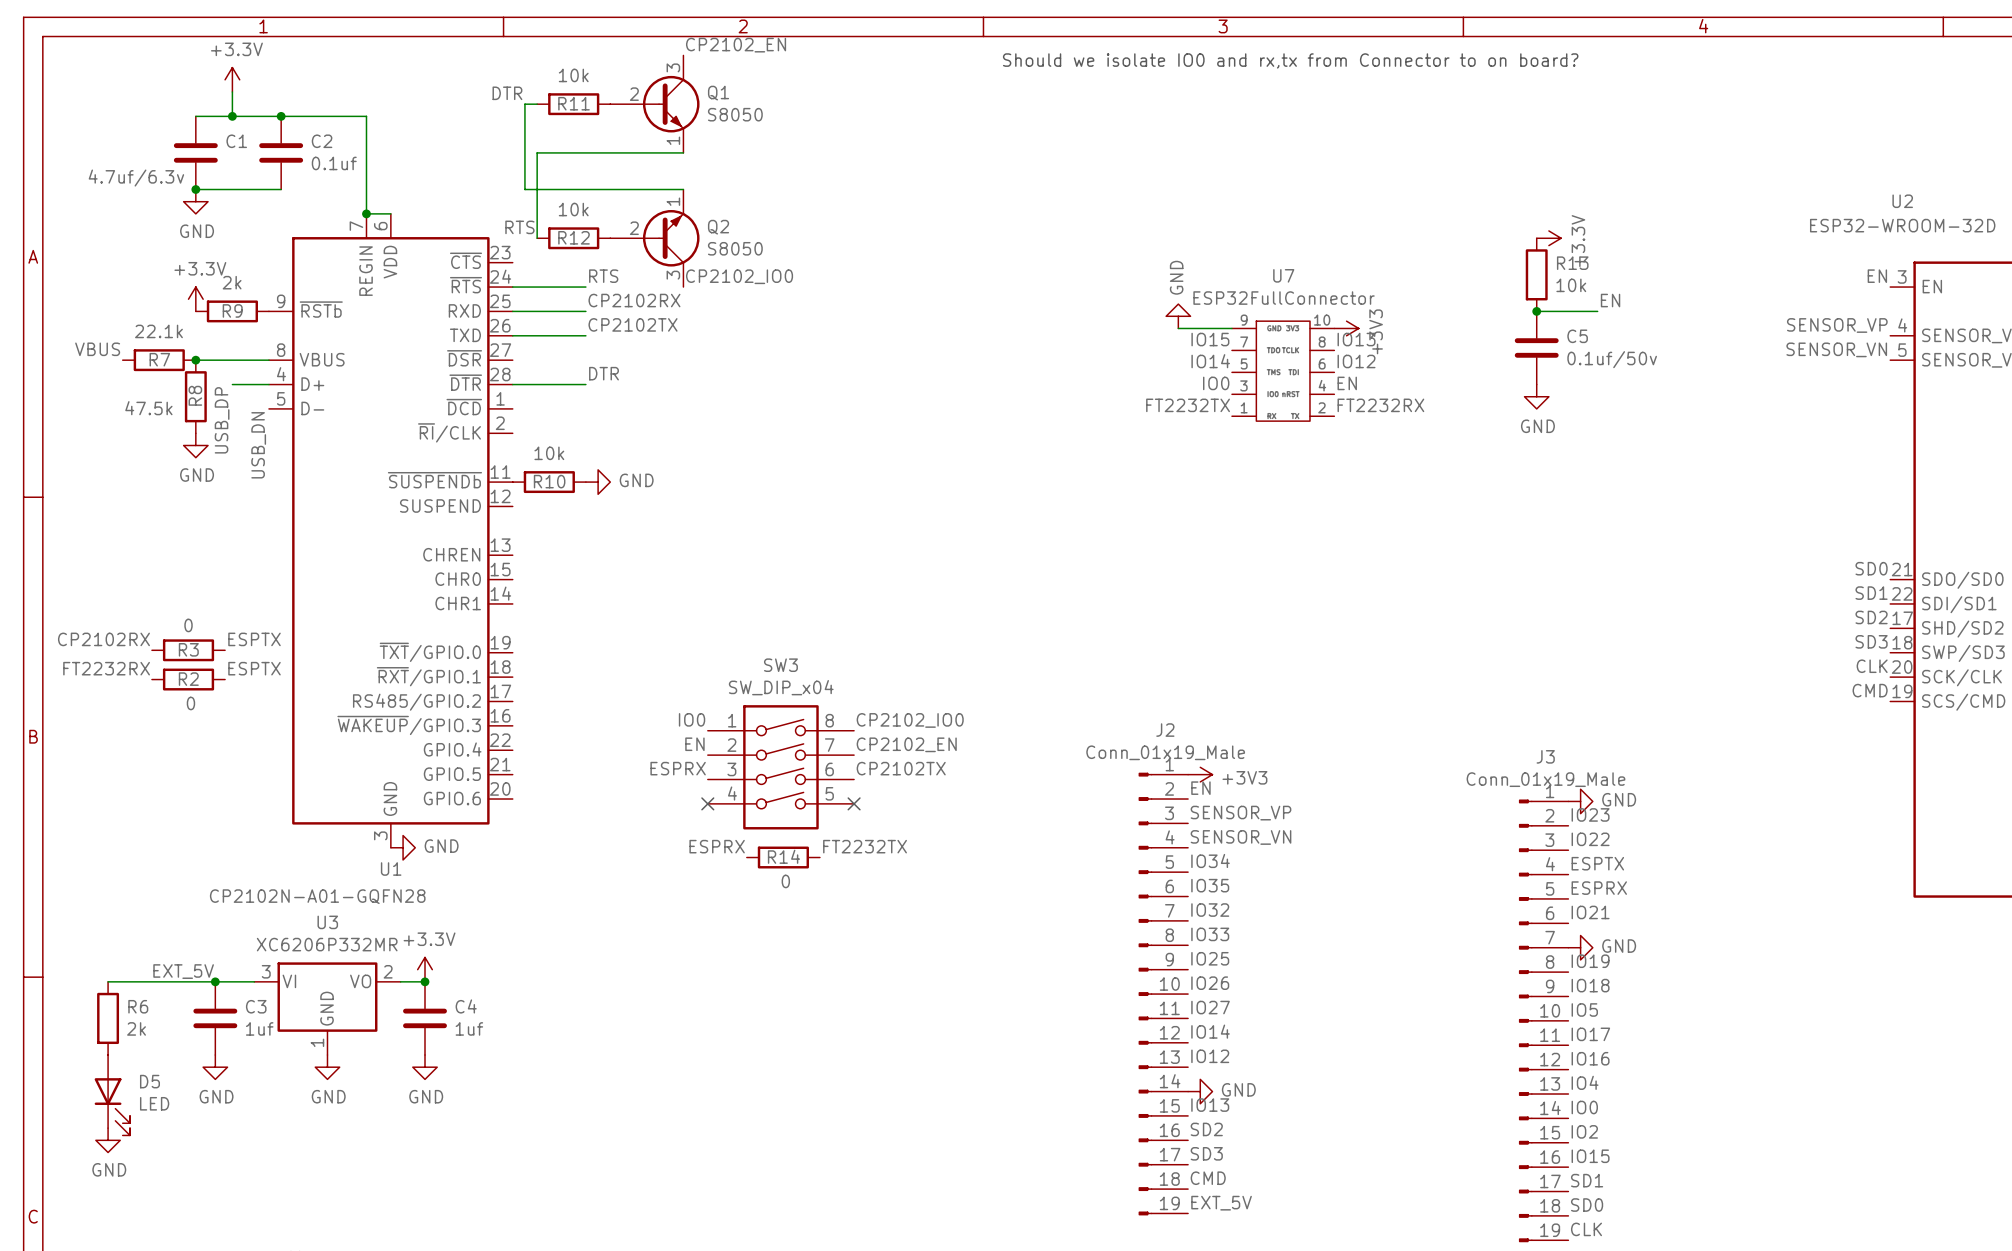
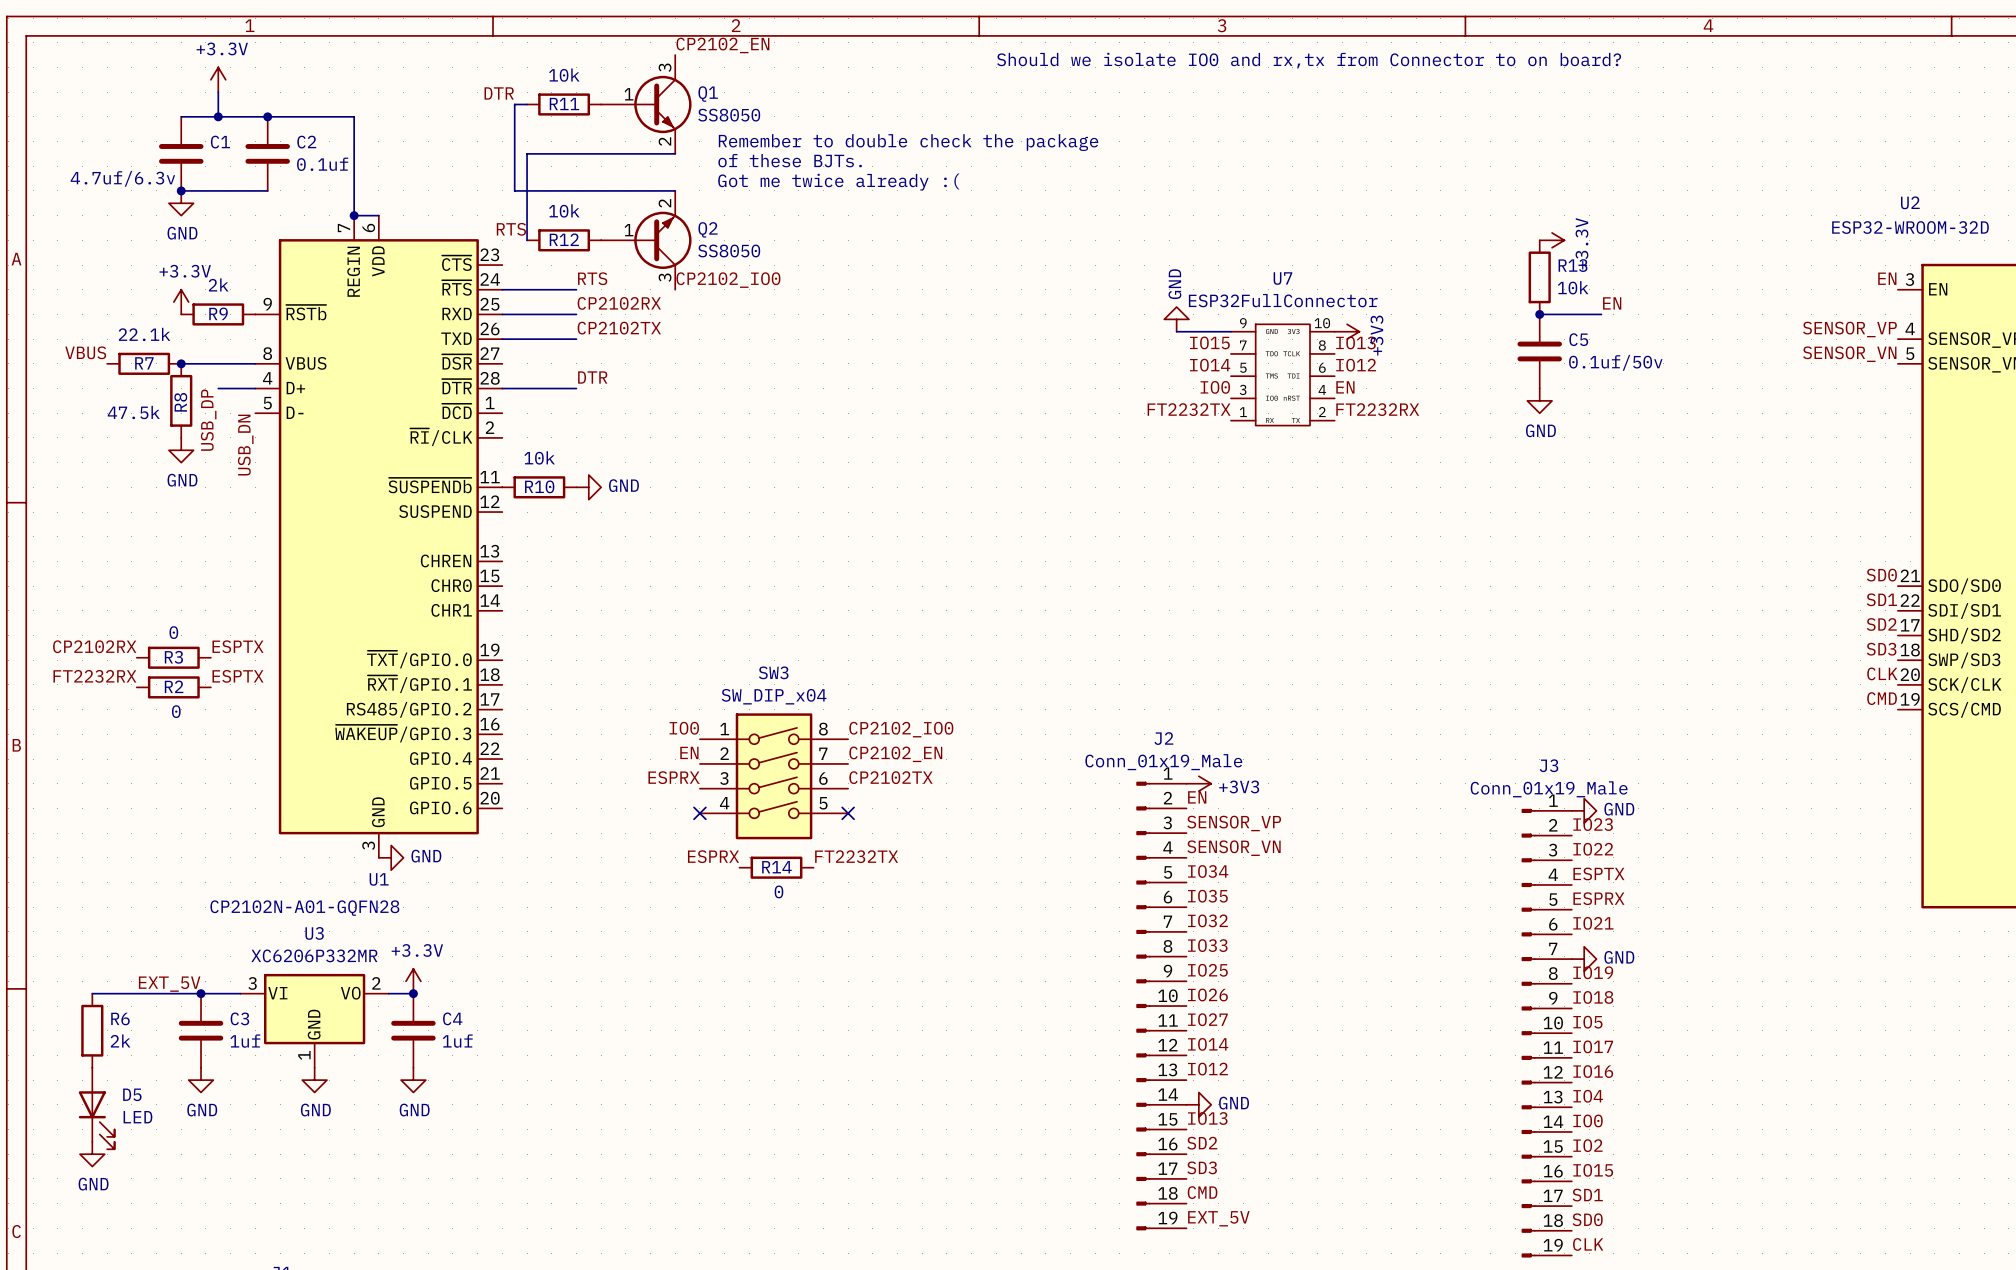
Q1 symbol: [610, 55, 700, 153] -> [601, 55, 692, 154]
Q1 value: S8050 (735, 114) -> SS8050 (729, 115)
text: none -> Remember to double check the package (908, 142)
text: none -> of these BJTs. (790, 160)
text: none -> Got me twice already :( (838, 182)
Q2 symbol: [610, 189, 700, 288] -> [601, 190, 692, 290]
Q2 value: S8050 (735, 248) -> SS8050 (729, 250)

